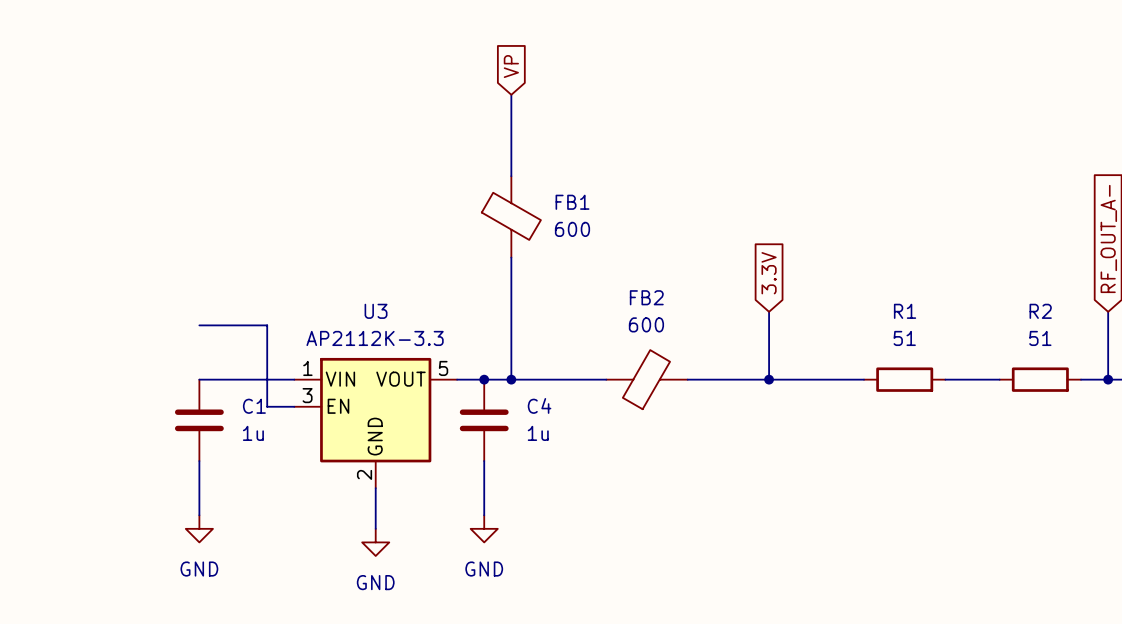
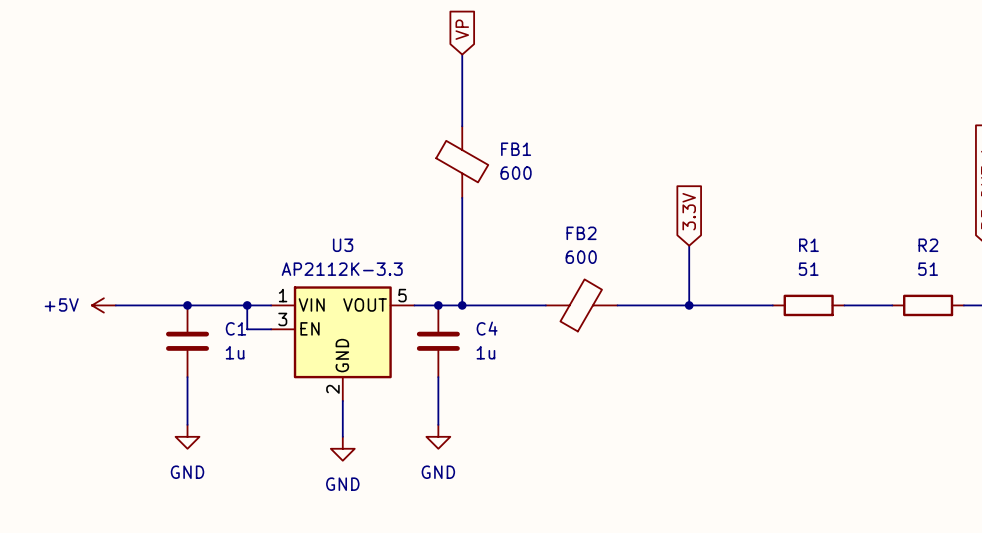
wire: (199, 325) (267, 325) (267, 379) -> none
power symbol: none -> +5V (103, 305)
wire: none -> (115, 305) (187, 305)
junction: none -> (187, 305)
junction: none -> (247, 305)

